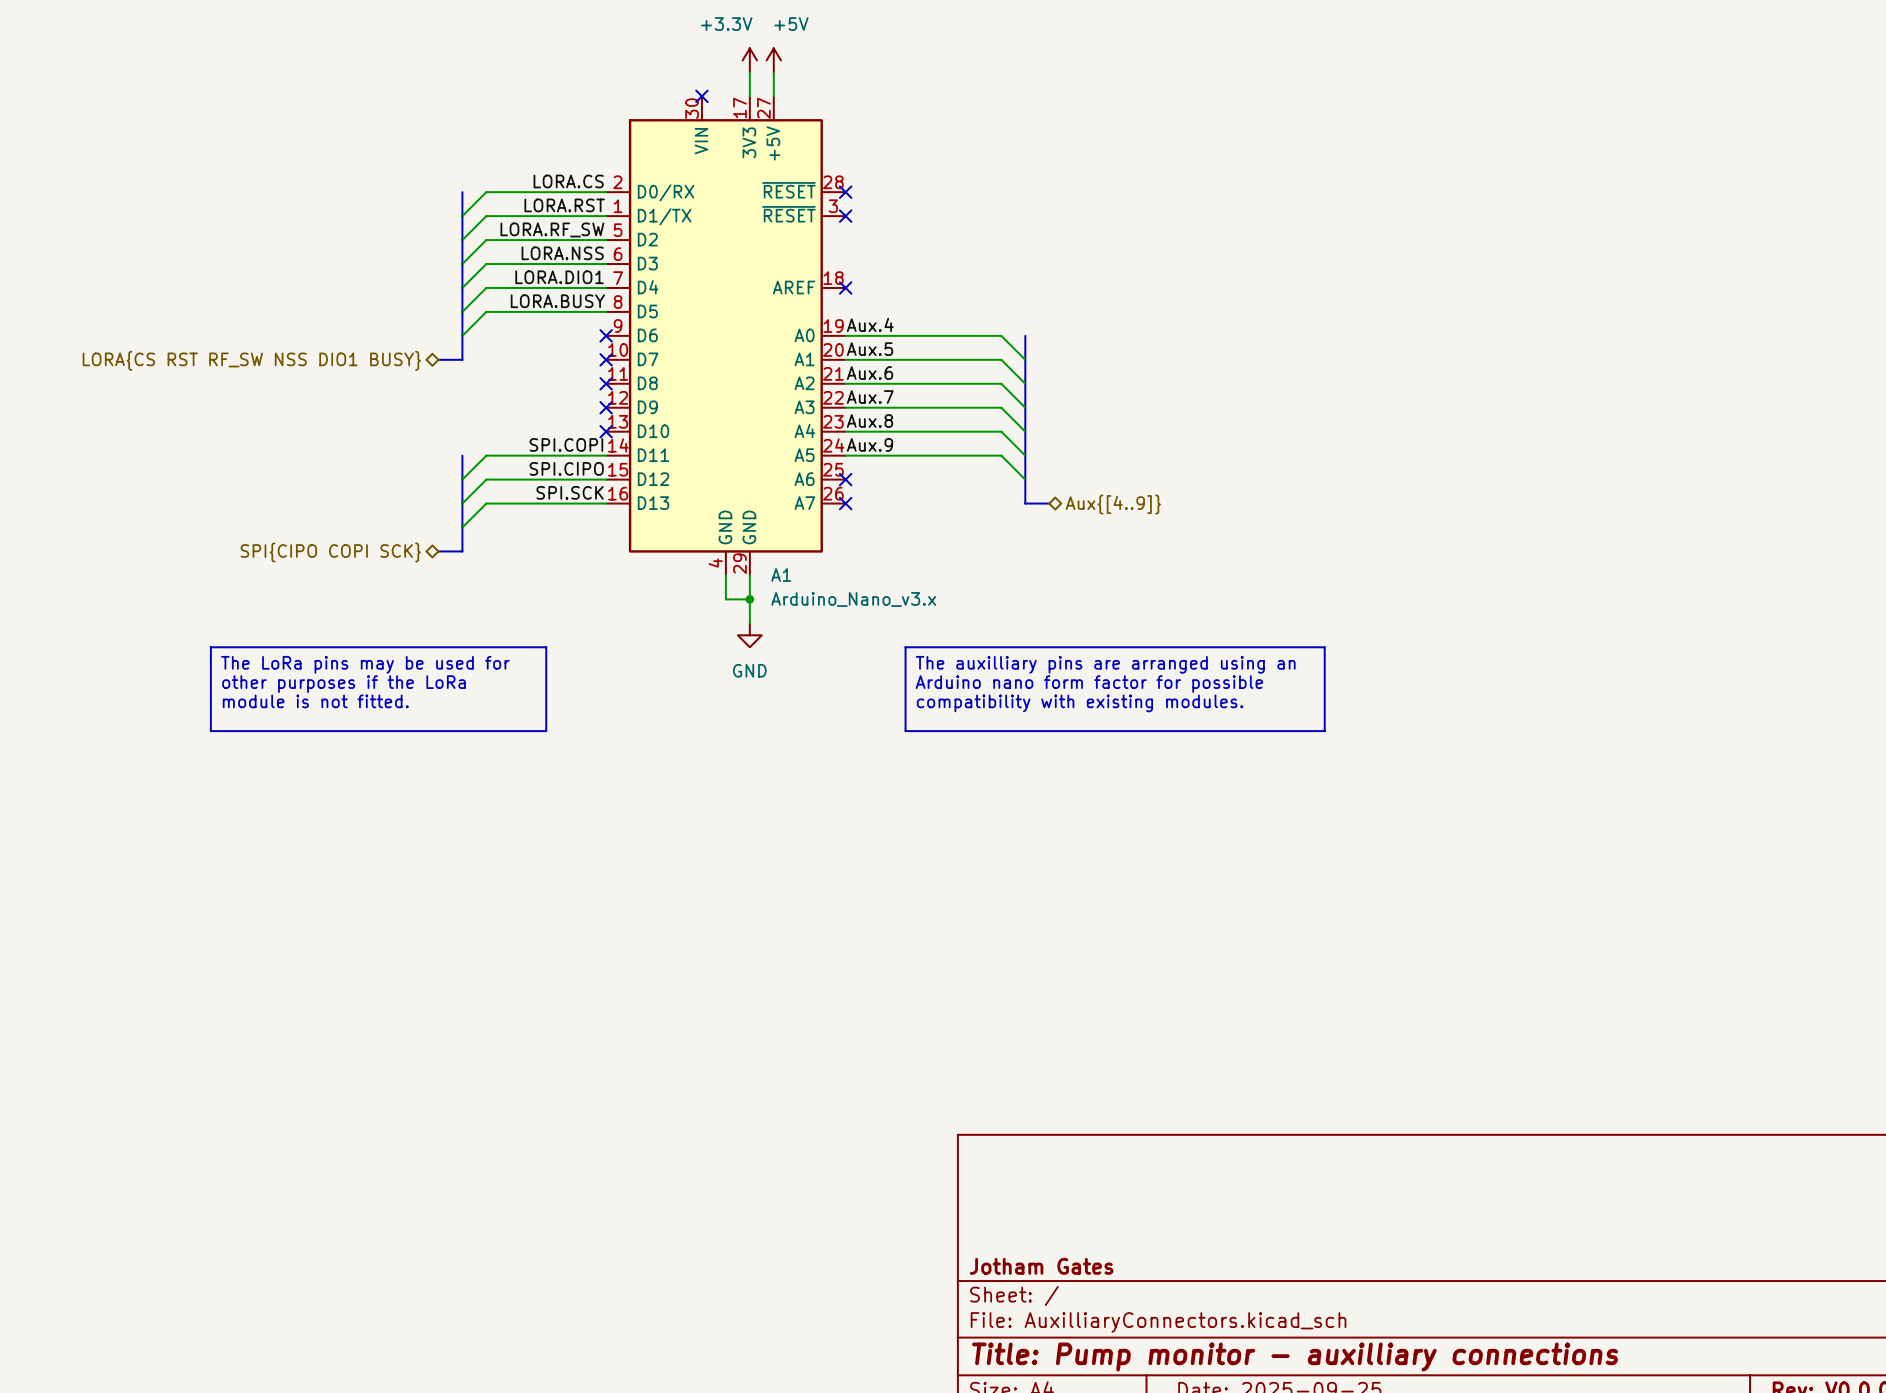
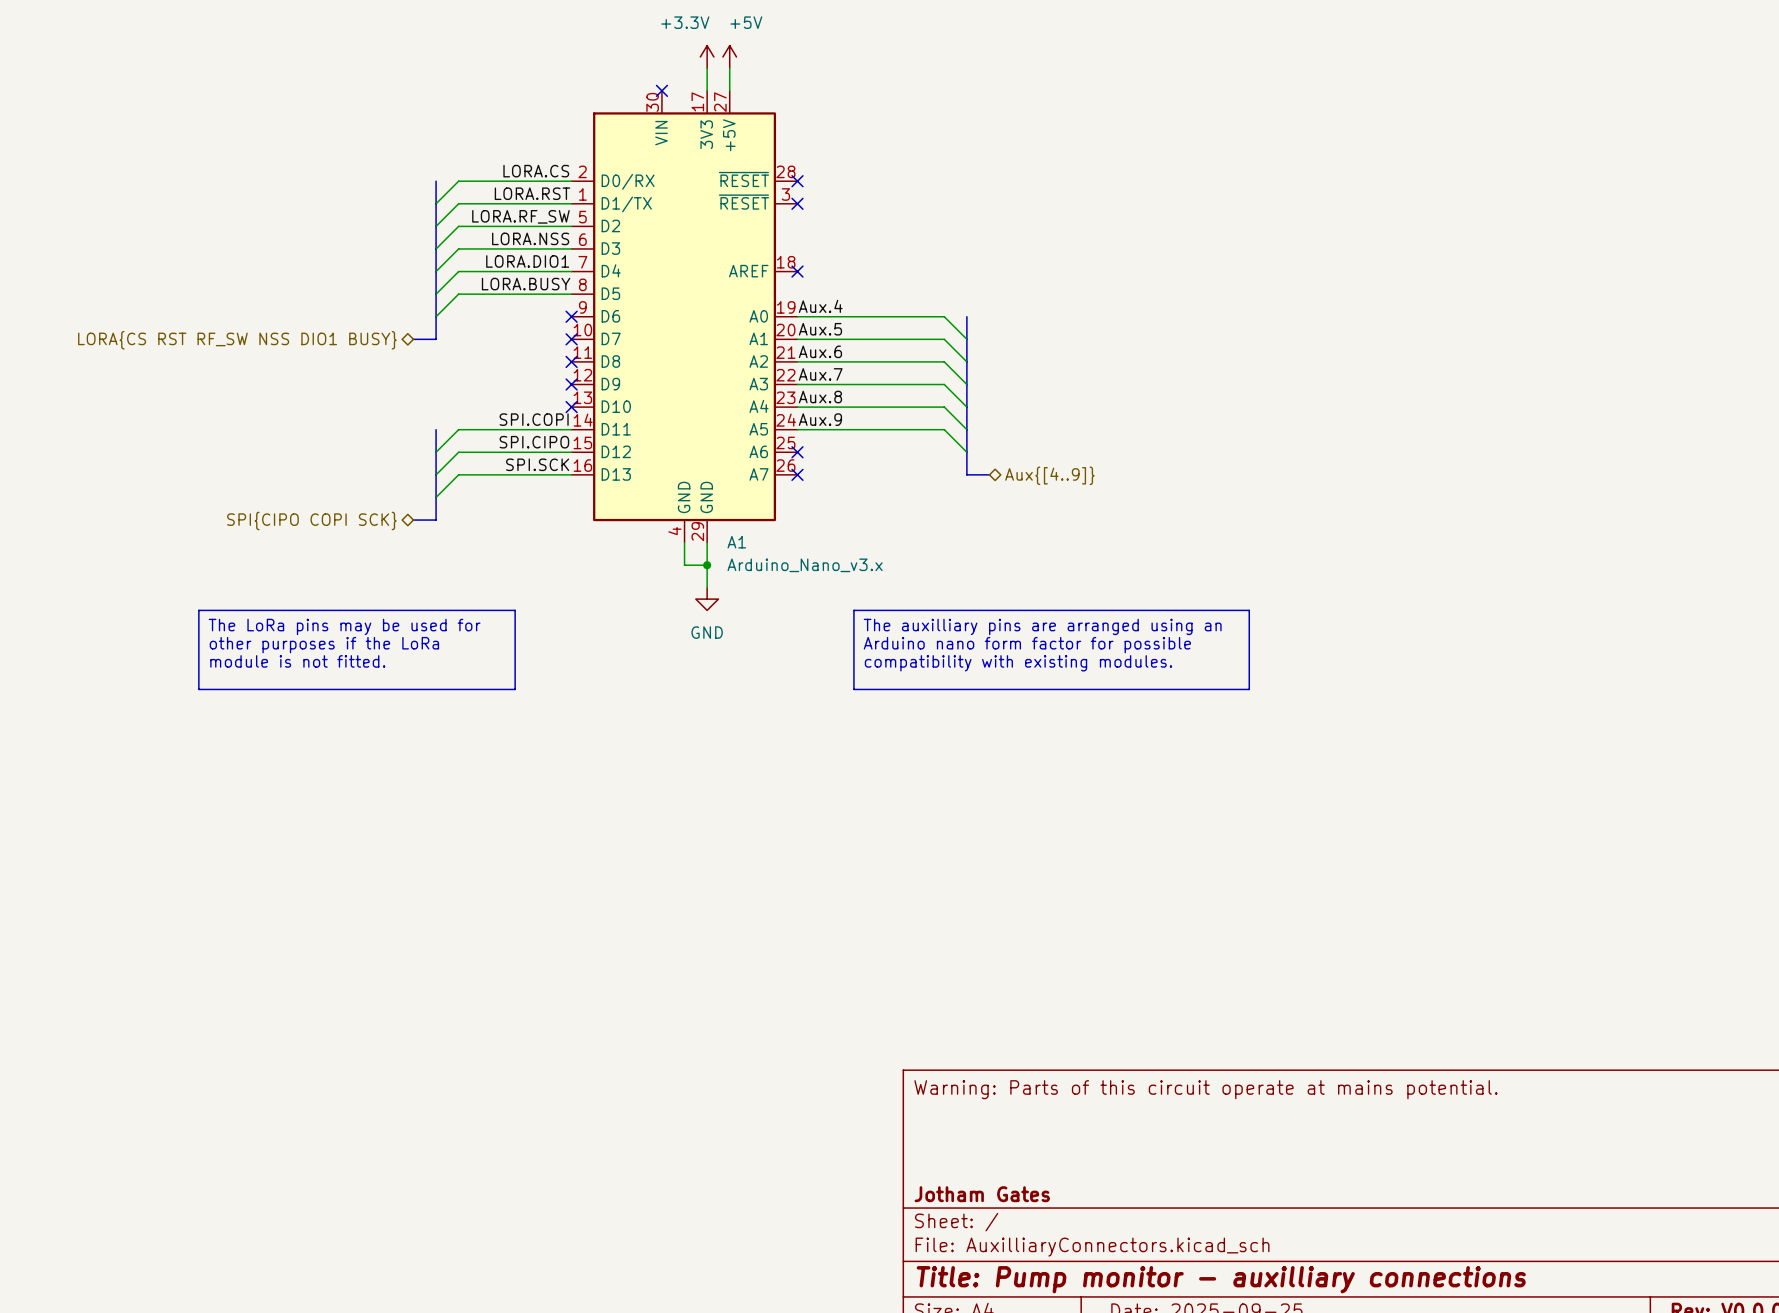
title block: none -> Warning: Parts of this circuit operate at mains potential. (1205, 1089)

